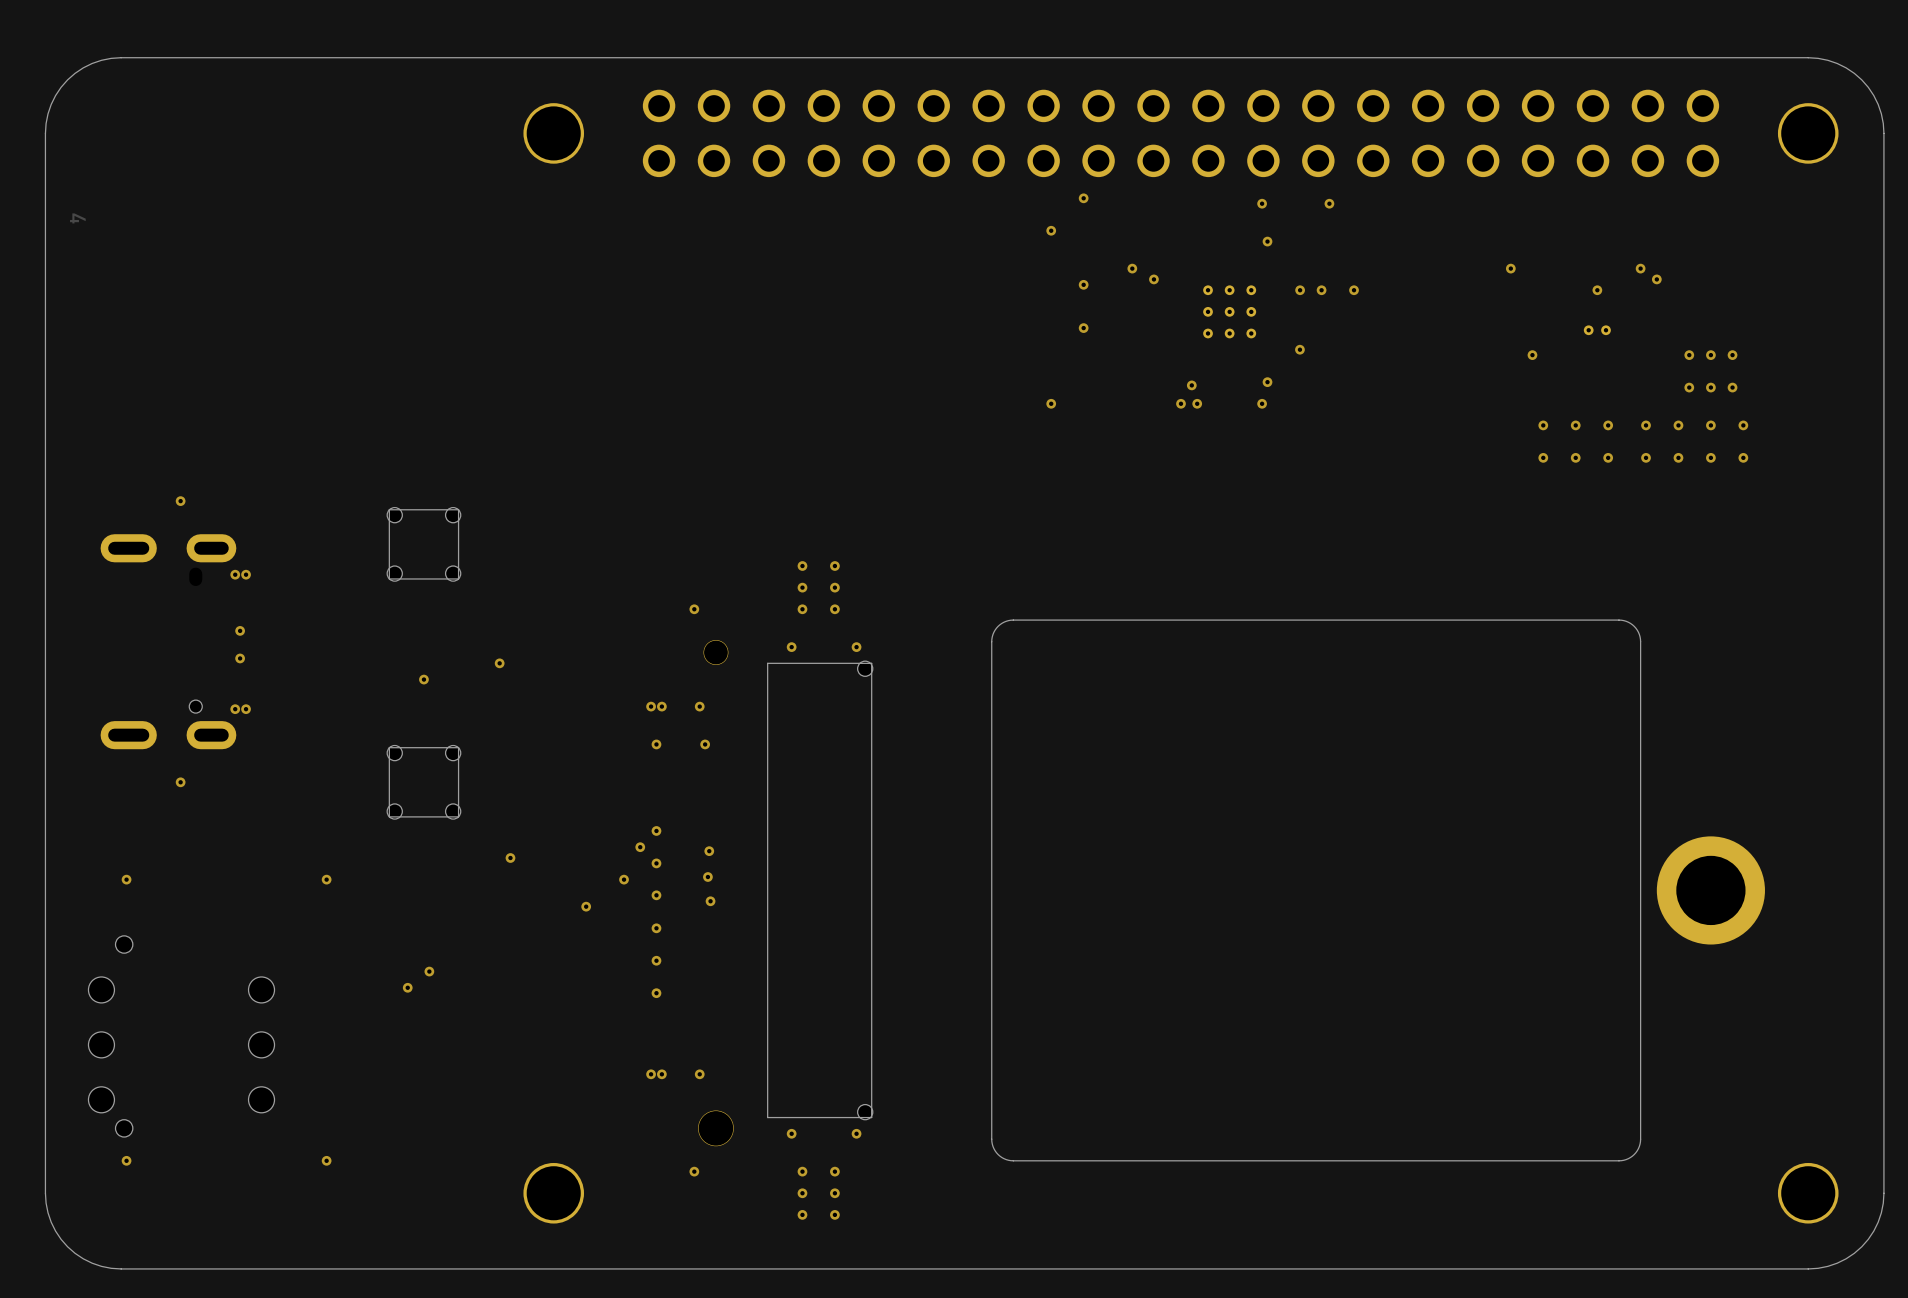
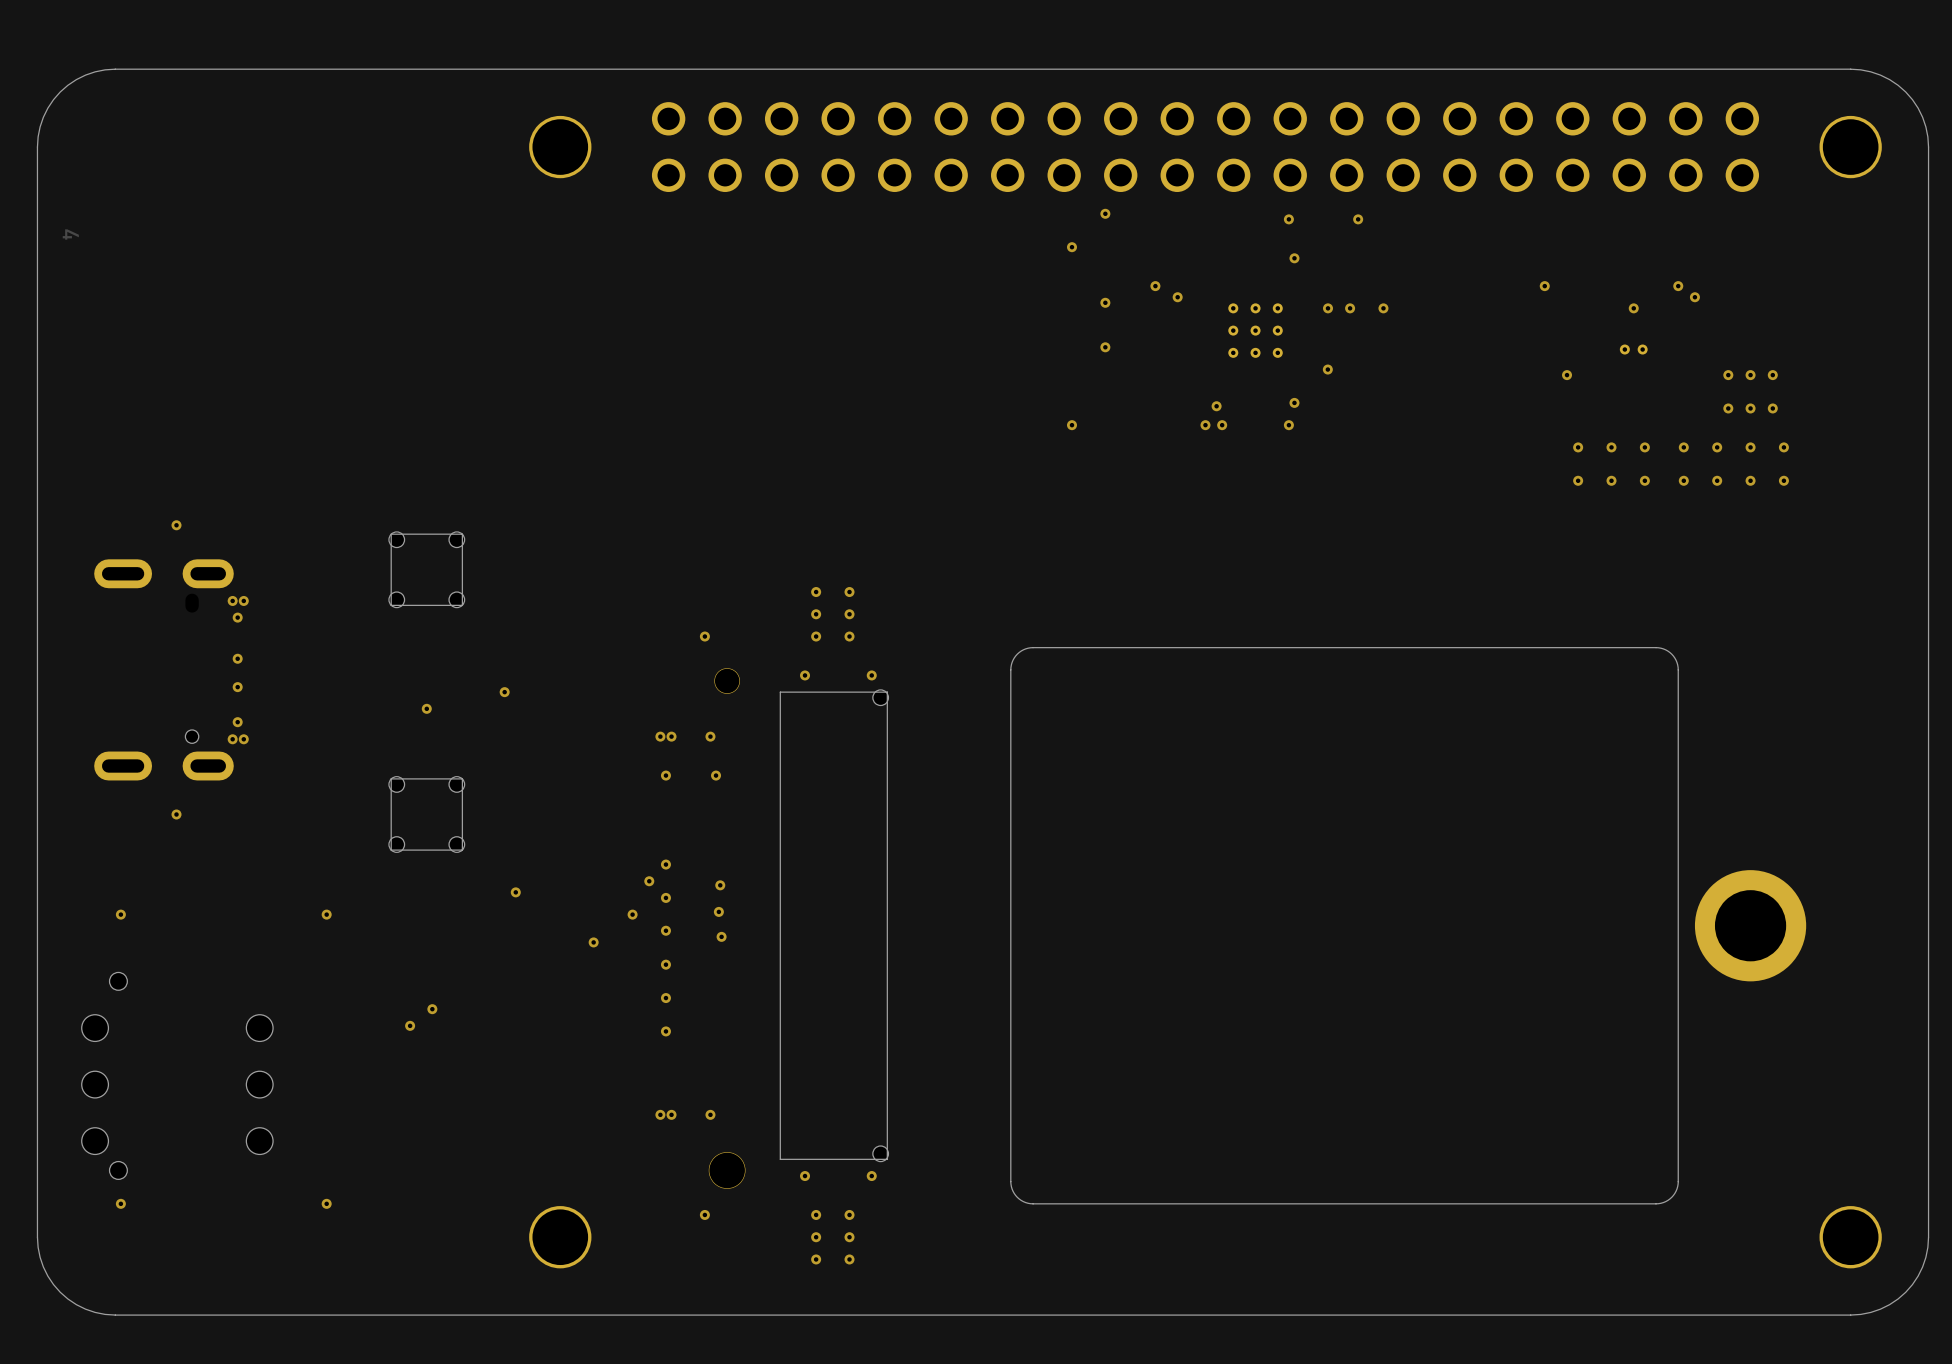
via: none -> (237, 617)
via: none -> (237, 722)

